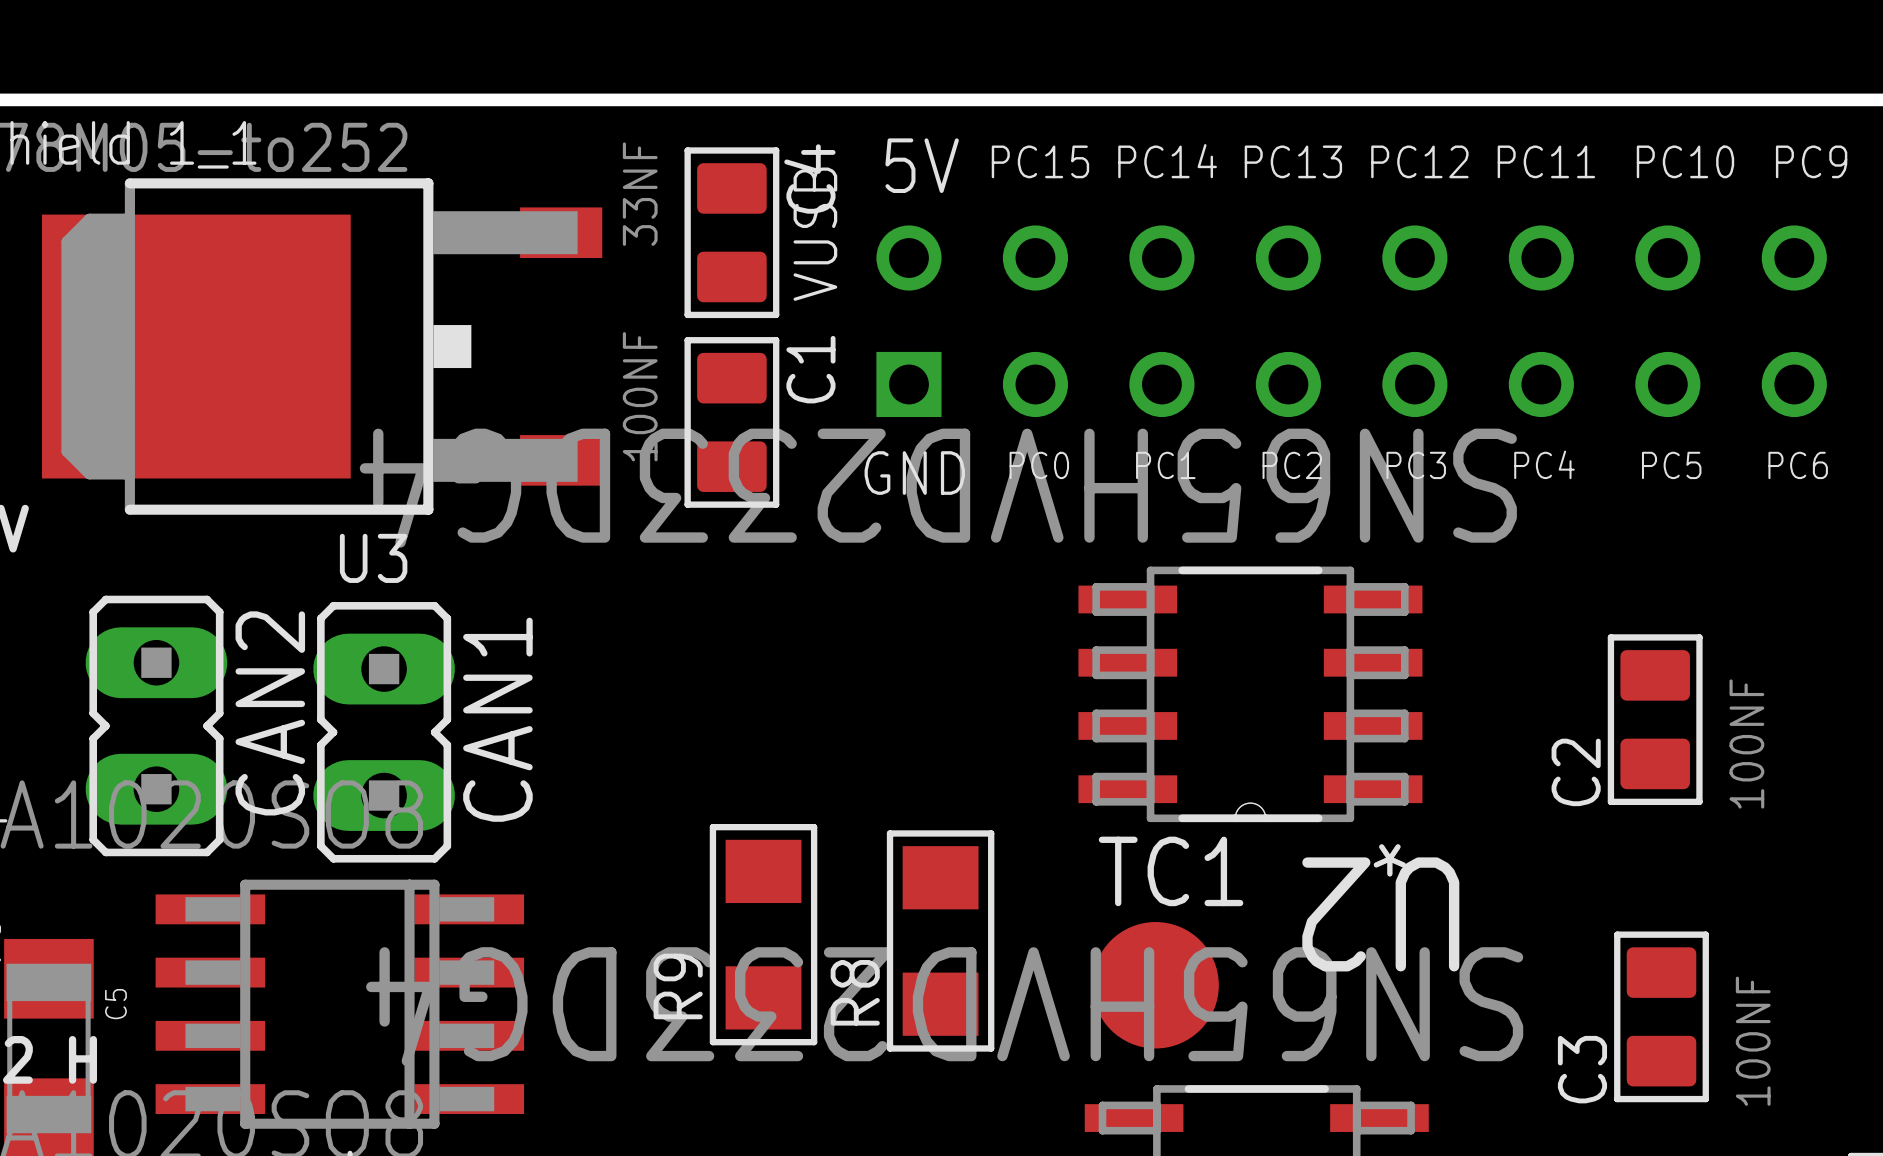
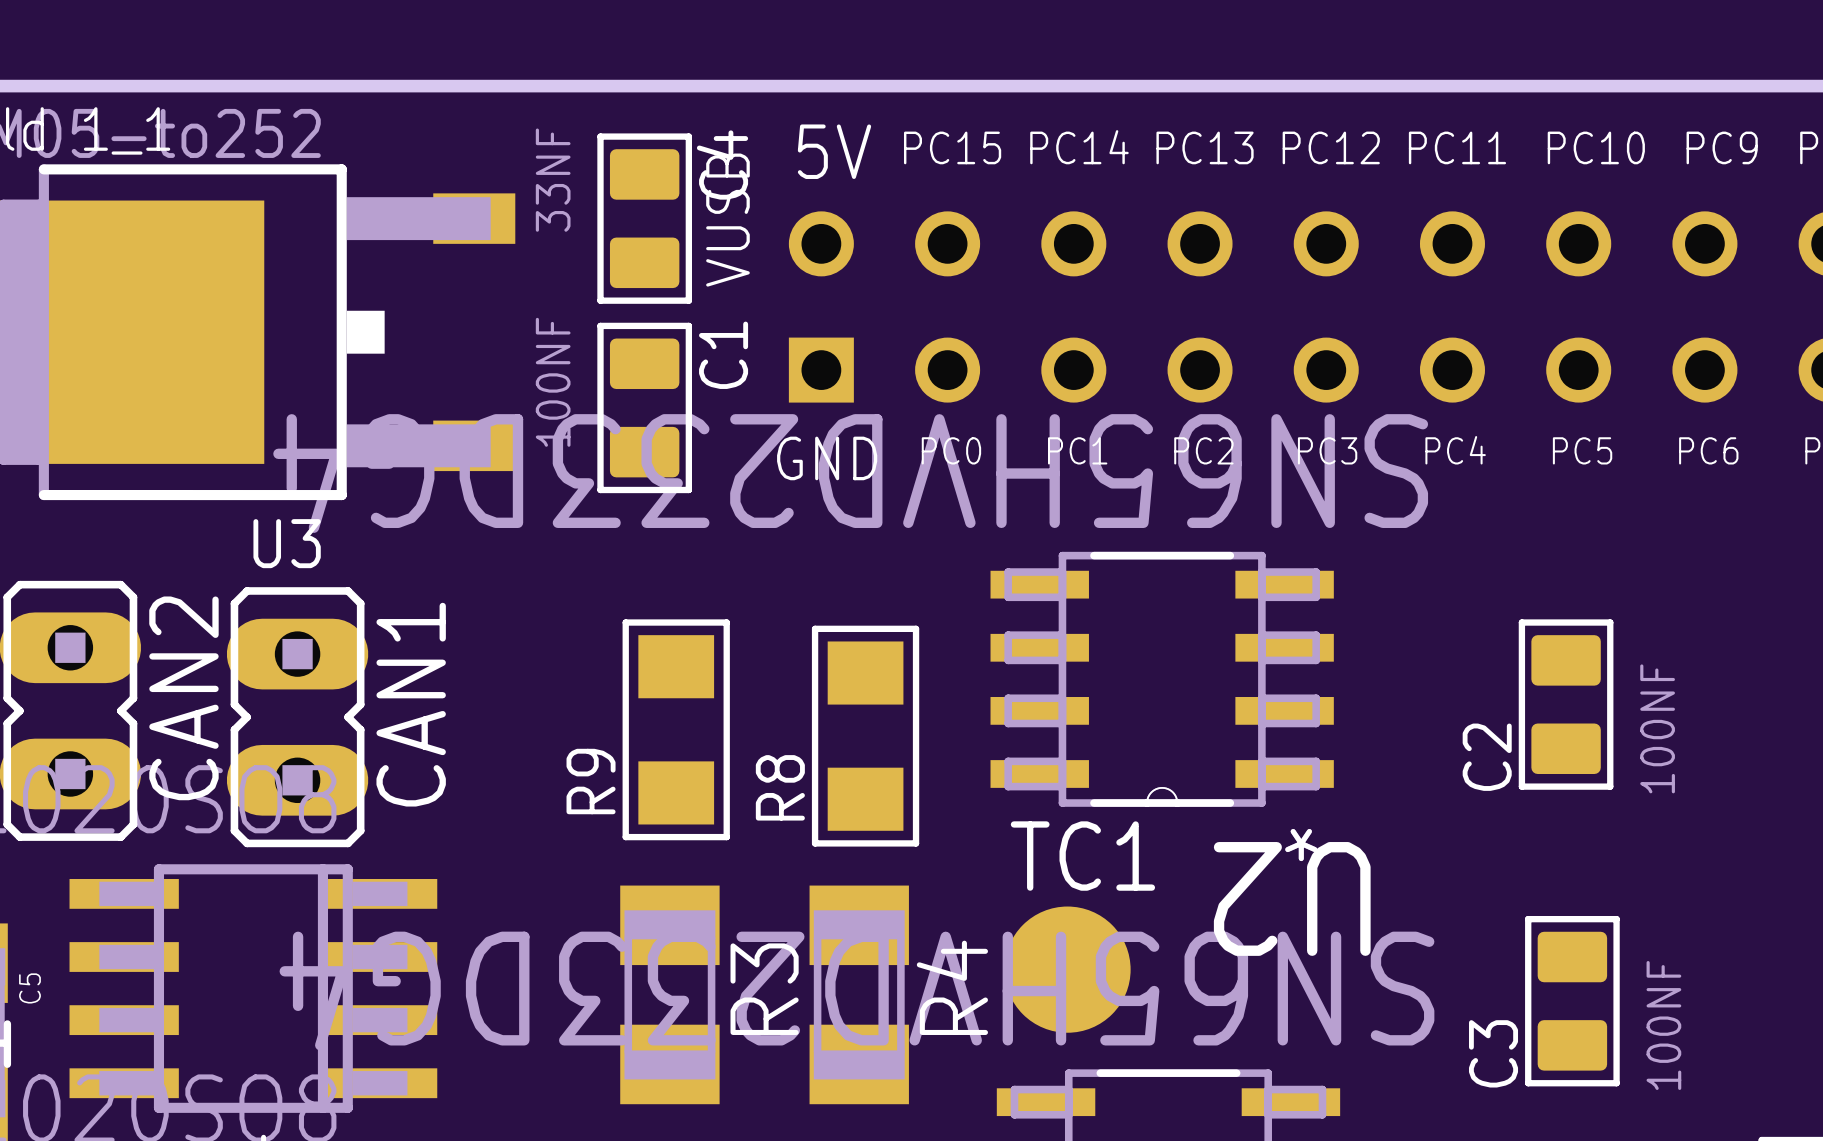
R9 position: (763, 934) -> (676, 729)
R8 position: (940, 940) -> (865, 736)
R3: none -> (669, 994)
R4: none -> (859, 994)

